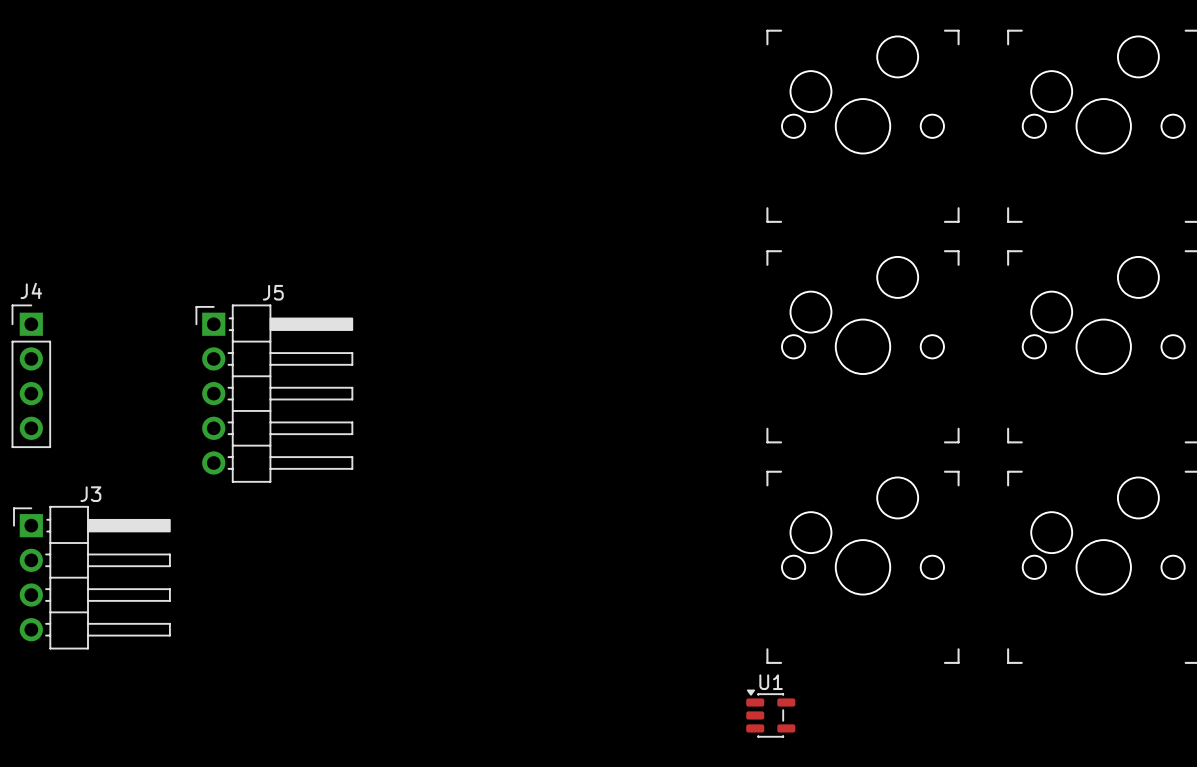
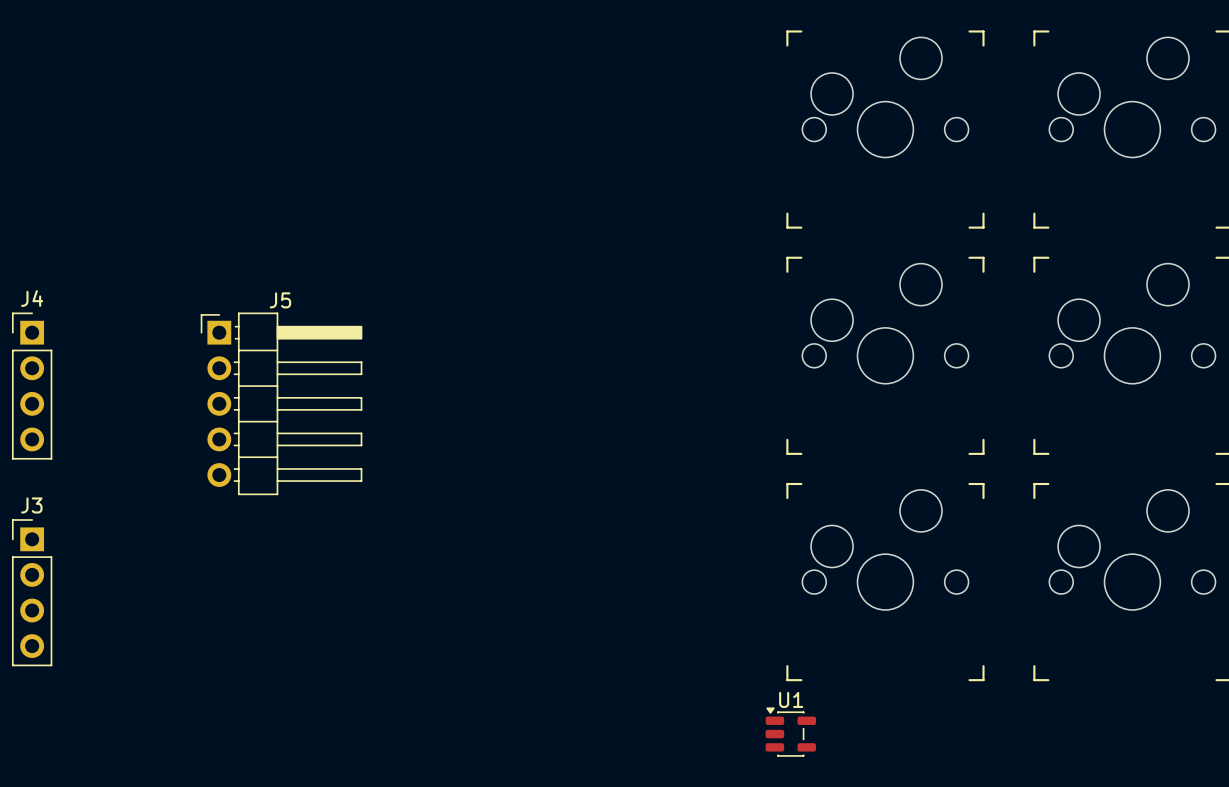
J3 footprint: [13, 505, 171, 650] -> [11, 519, 53, 667]

